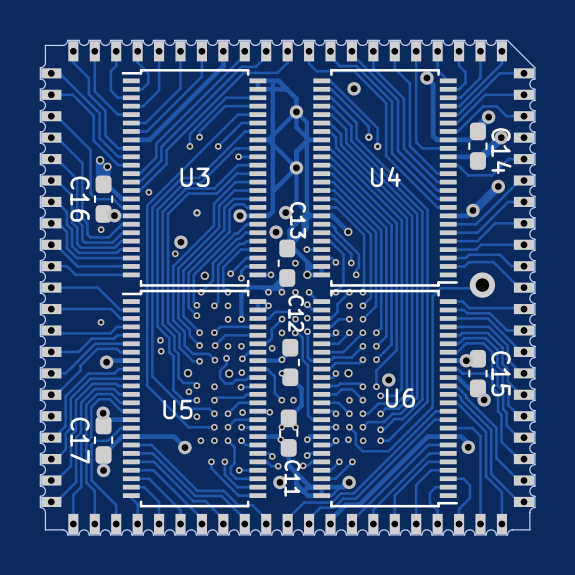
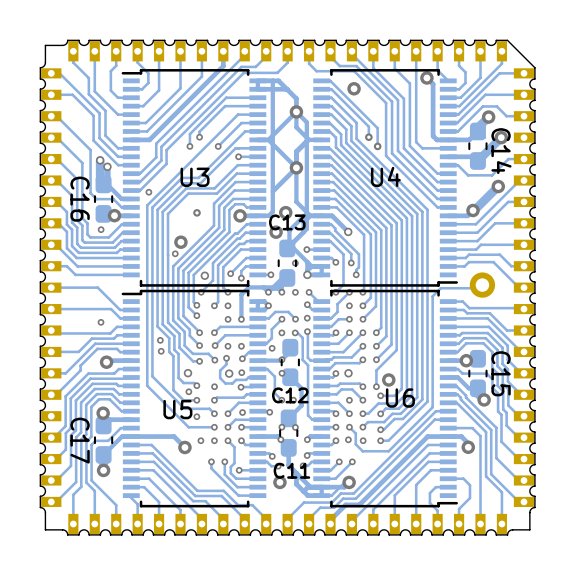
C13 footprint: [277, 239, 296, 287] -> [277, 239, 297, 287]
C12 name position: C12 (296, 313) -> C12 (290, 395)
C12 footprint: [282, 338, 300, 387] -> [280, 338, 300, 387]
C11 name rotation: 0° (292, 478) -> 90° counterclockwise (291, 470)

